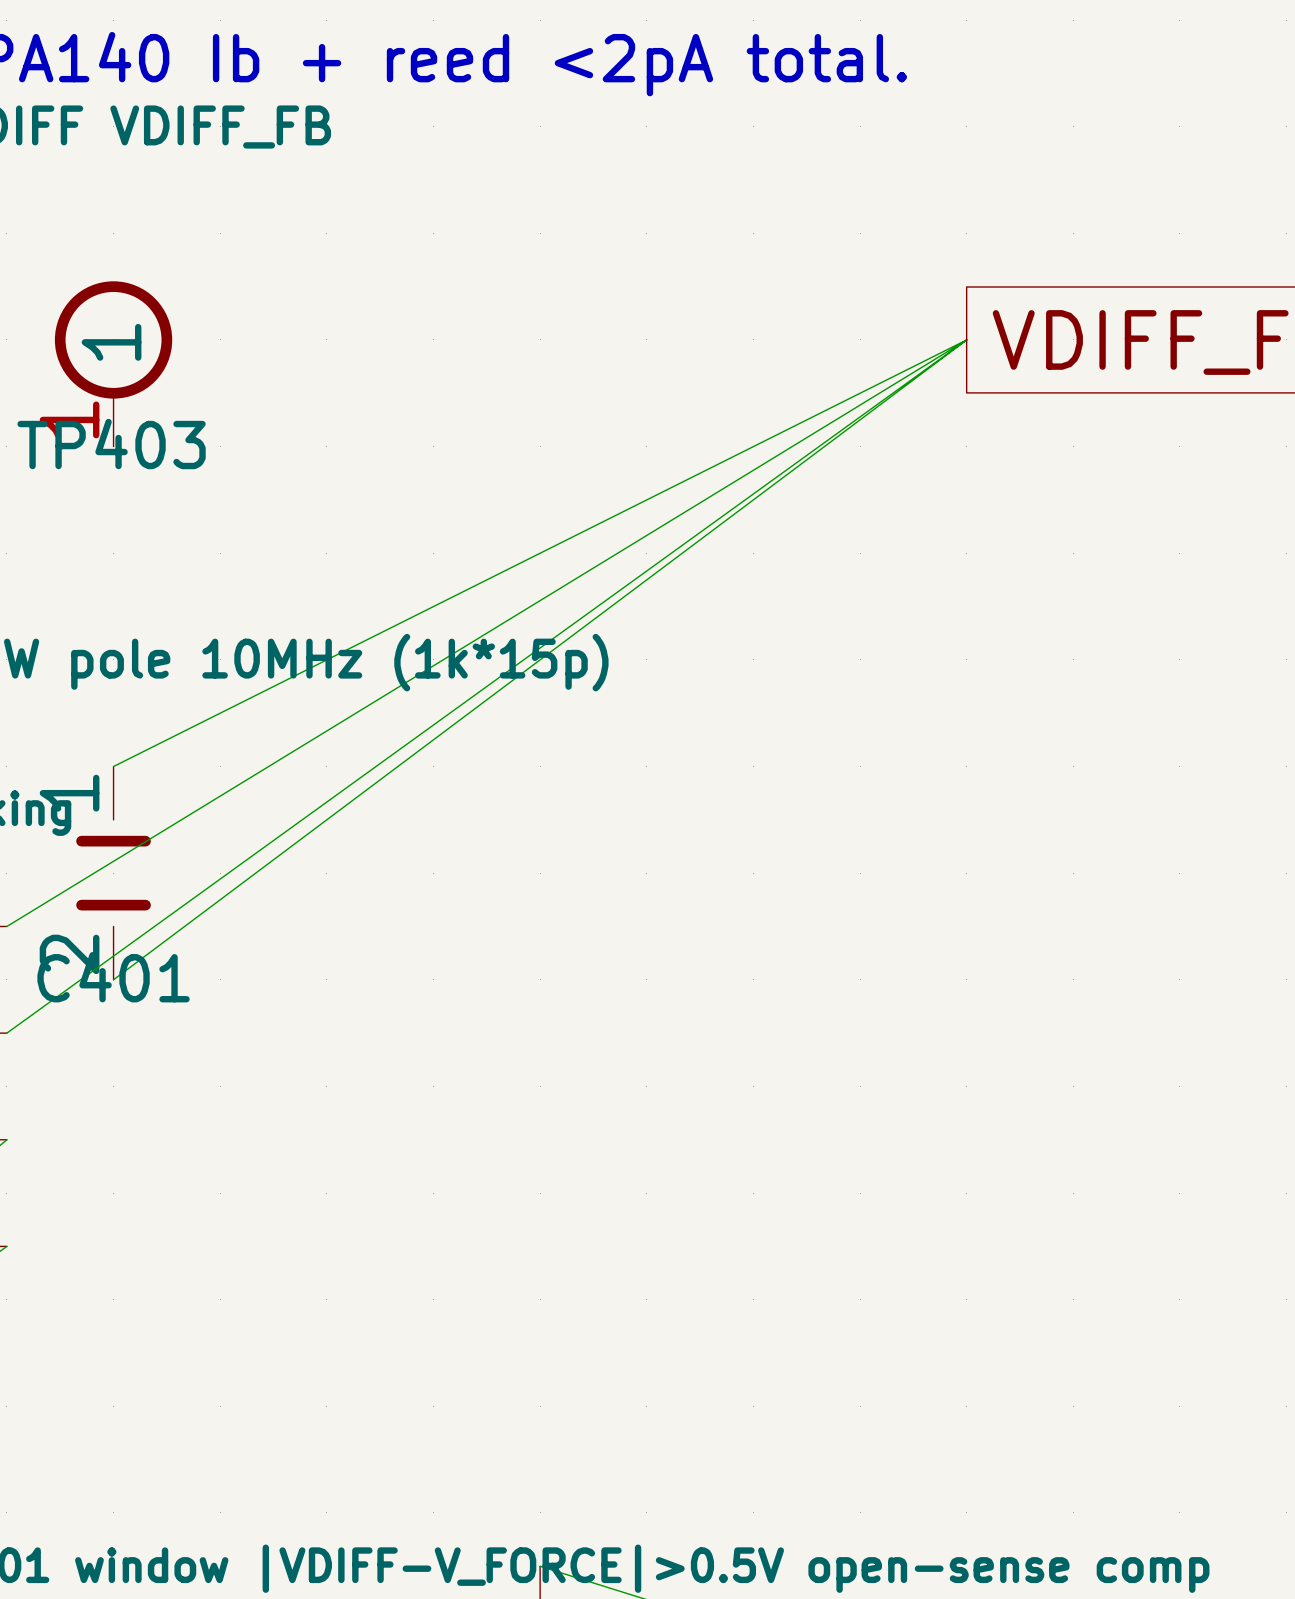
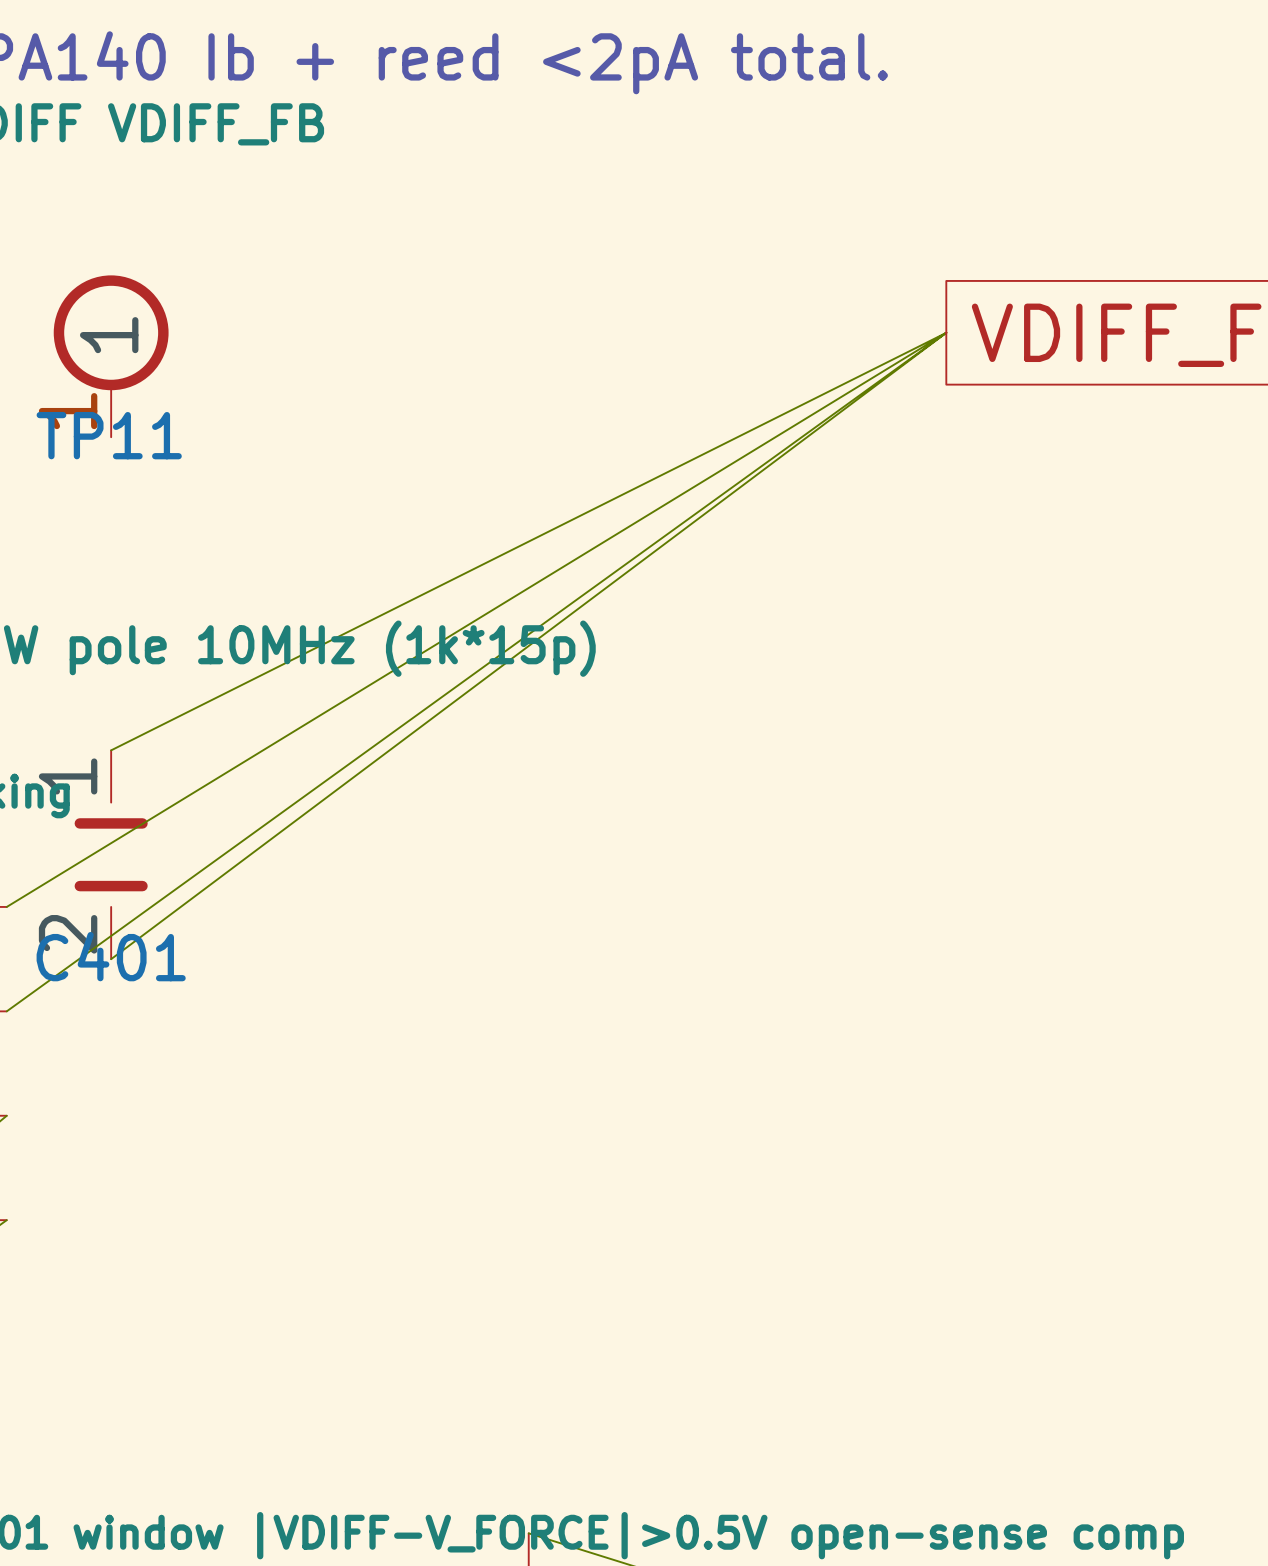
TP403 name: TP403 (111, 444) -> TP11 (109, 435)

